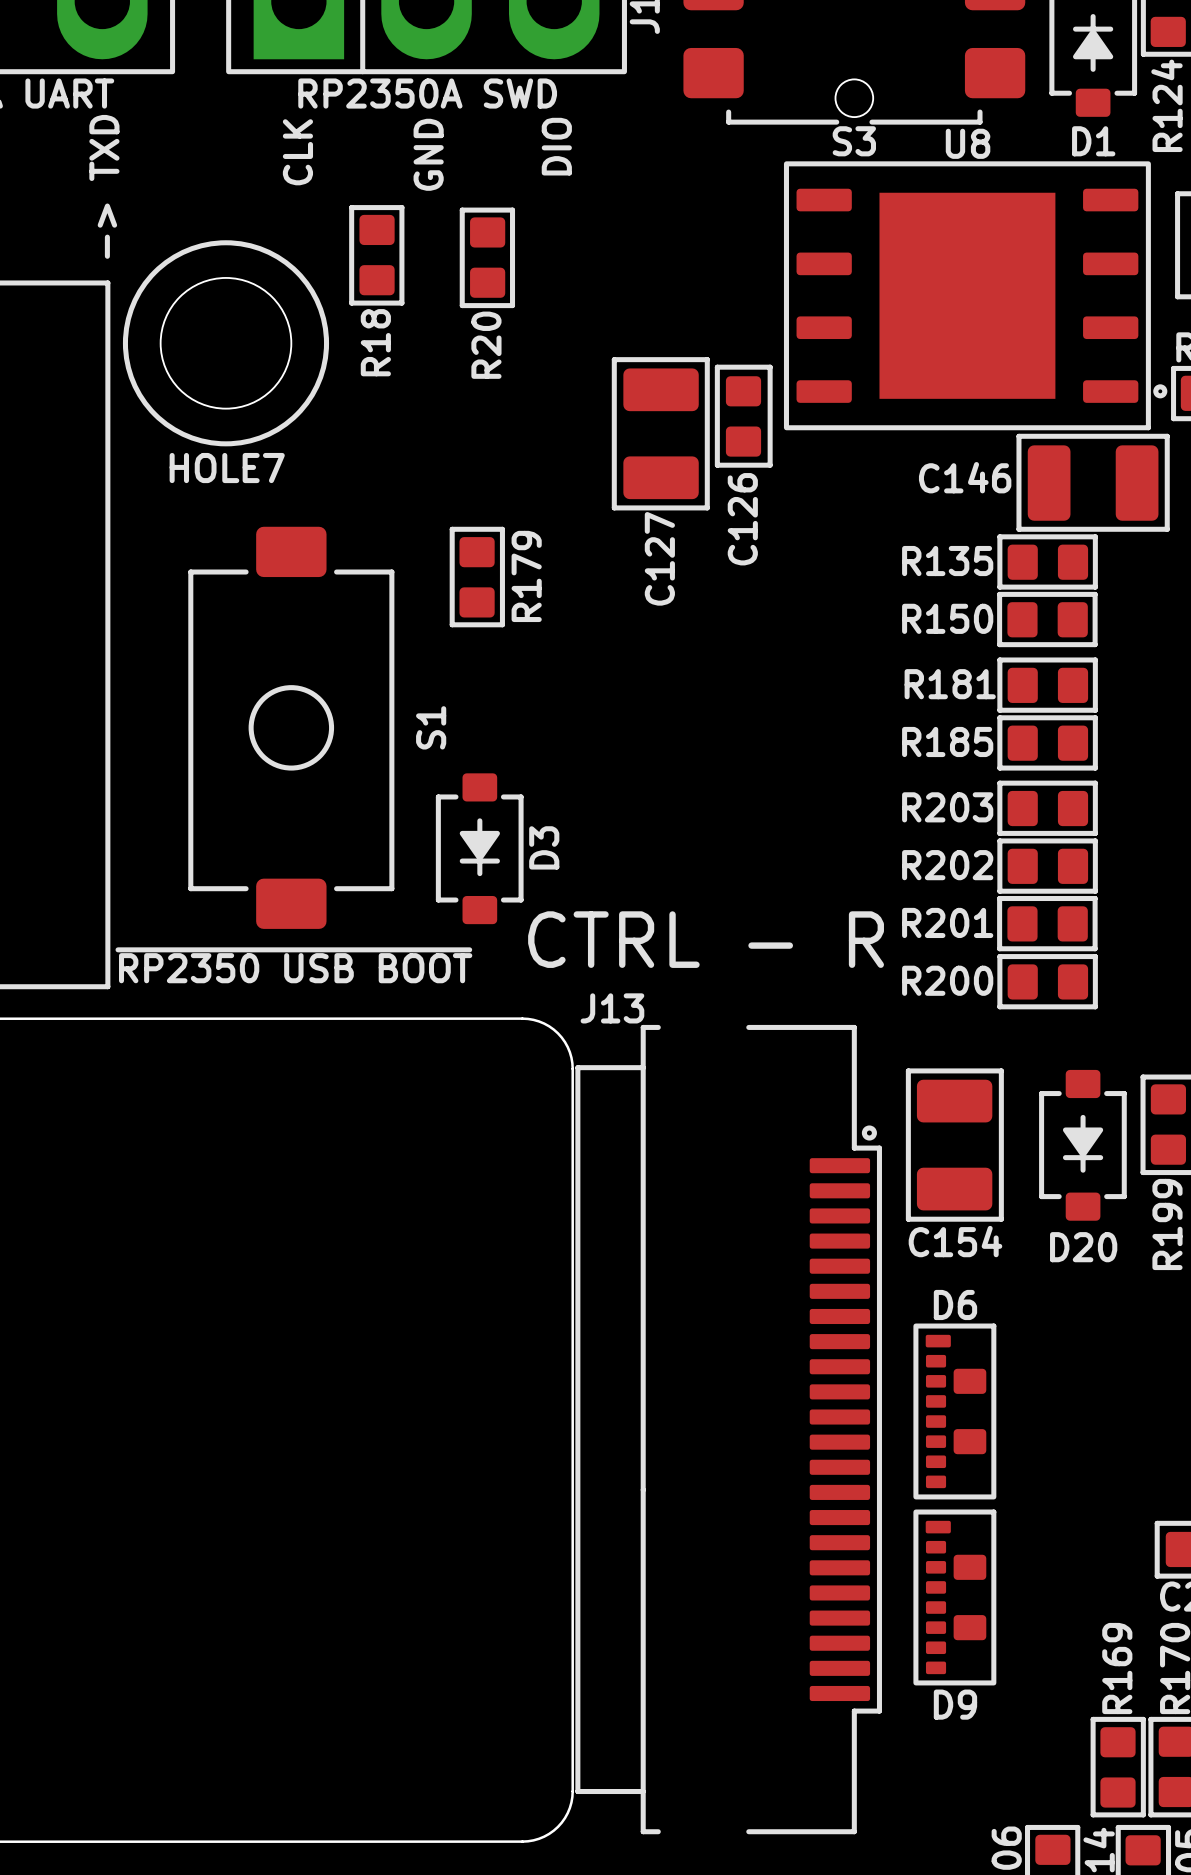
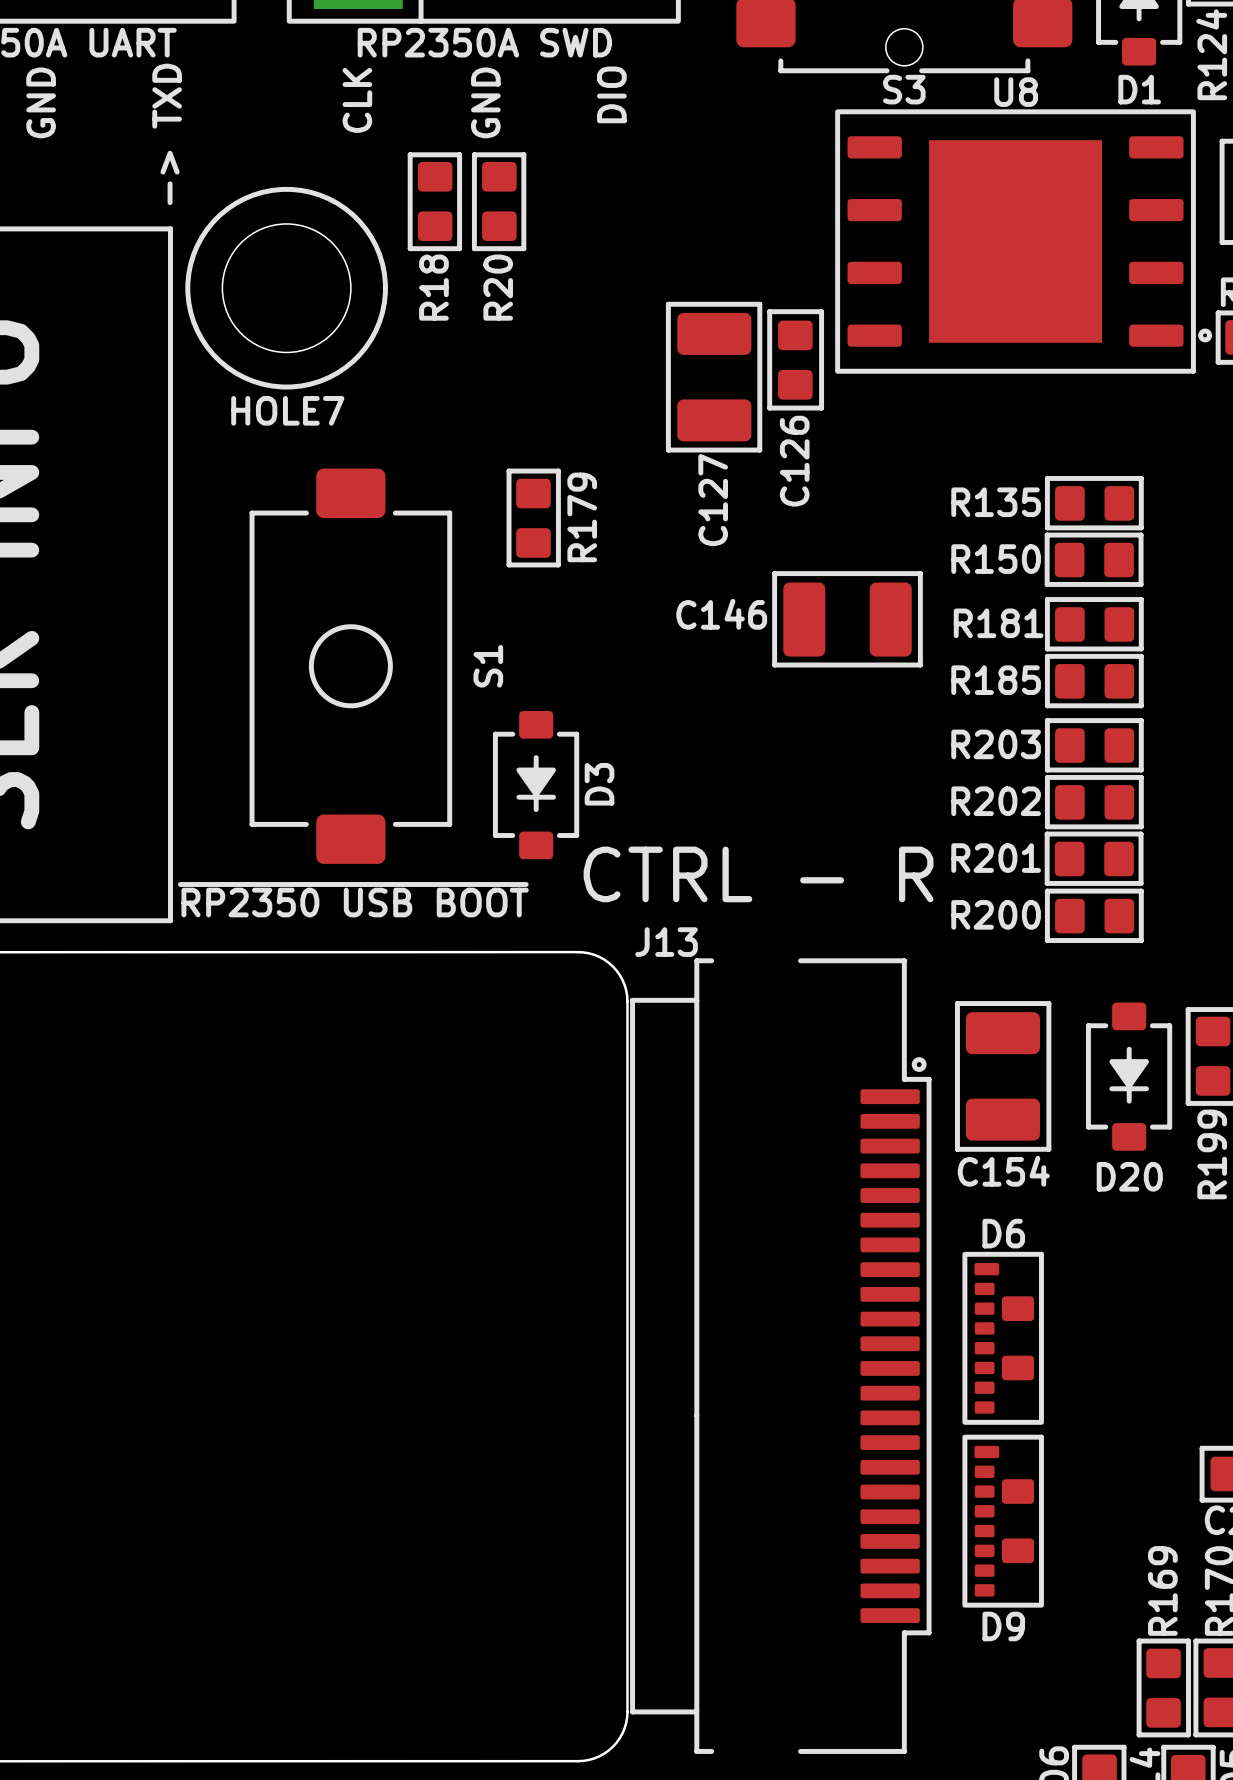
R20 position: (487, 257) -> (499, 201)
C146 position: (1093, 482) -> (847, 619)

